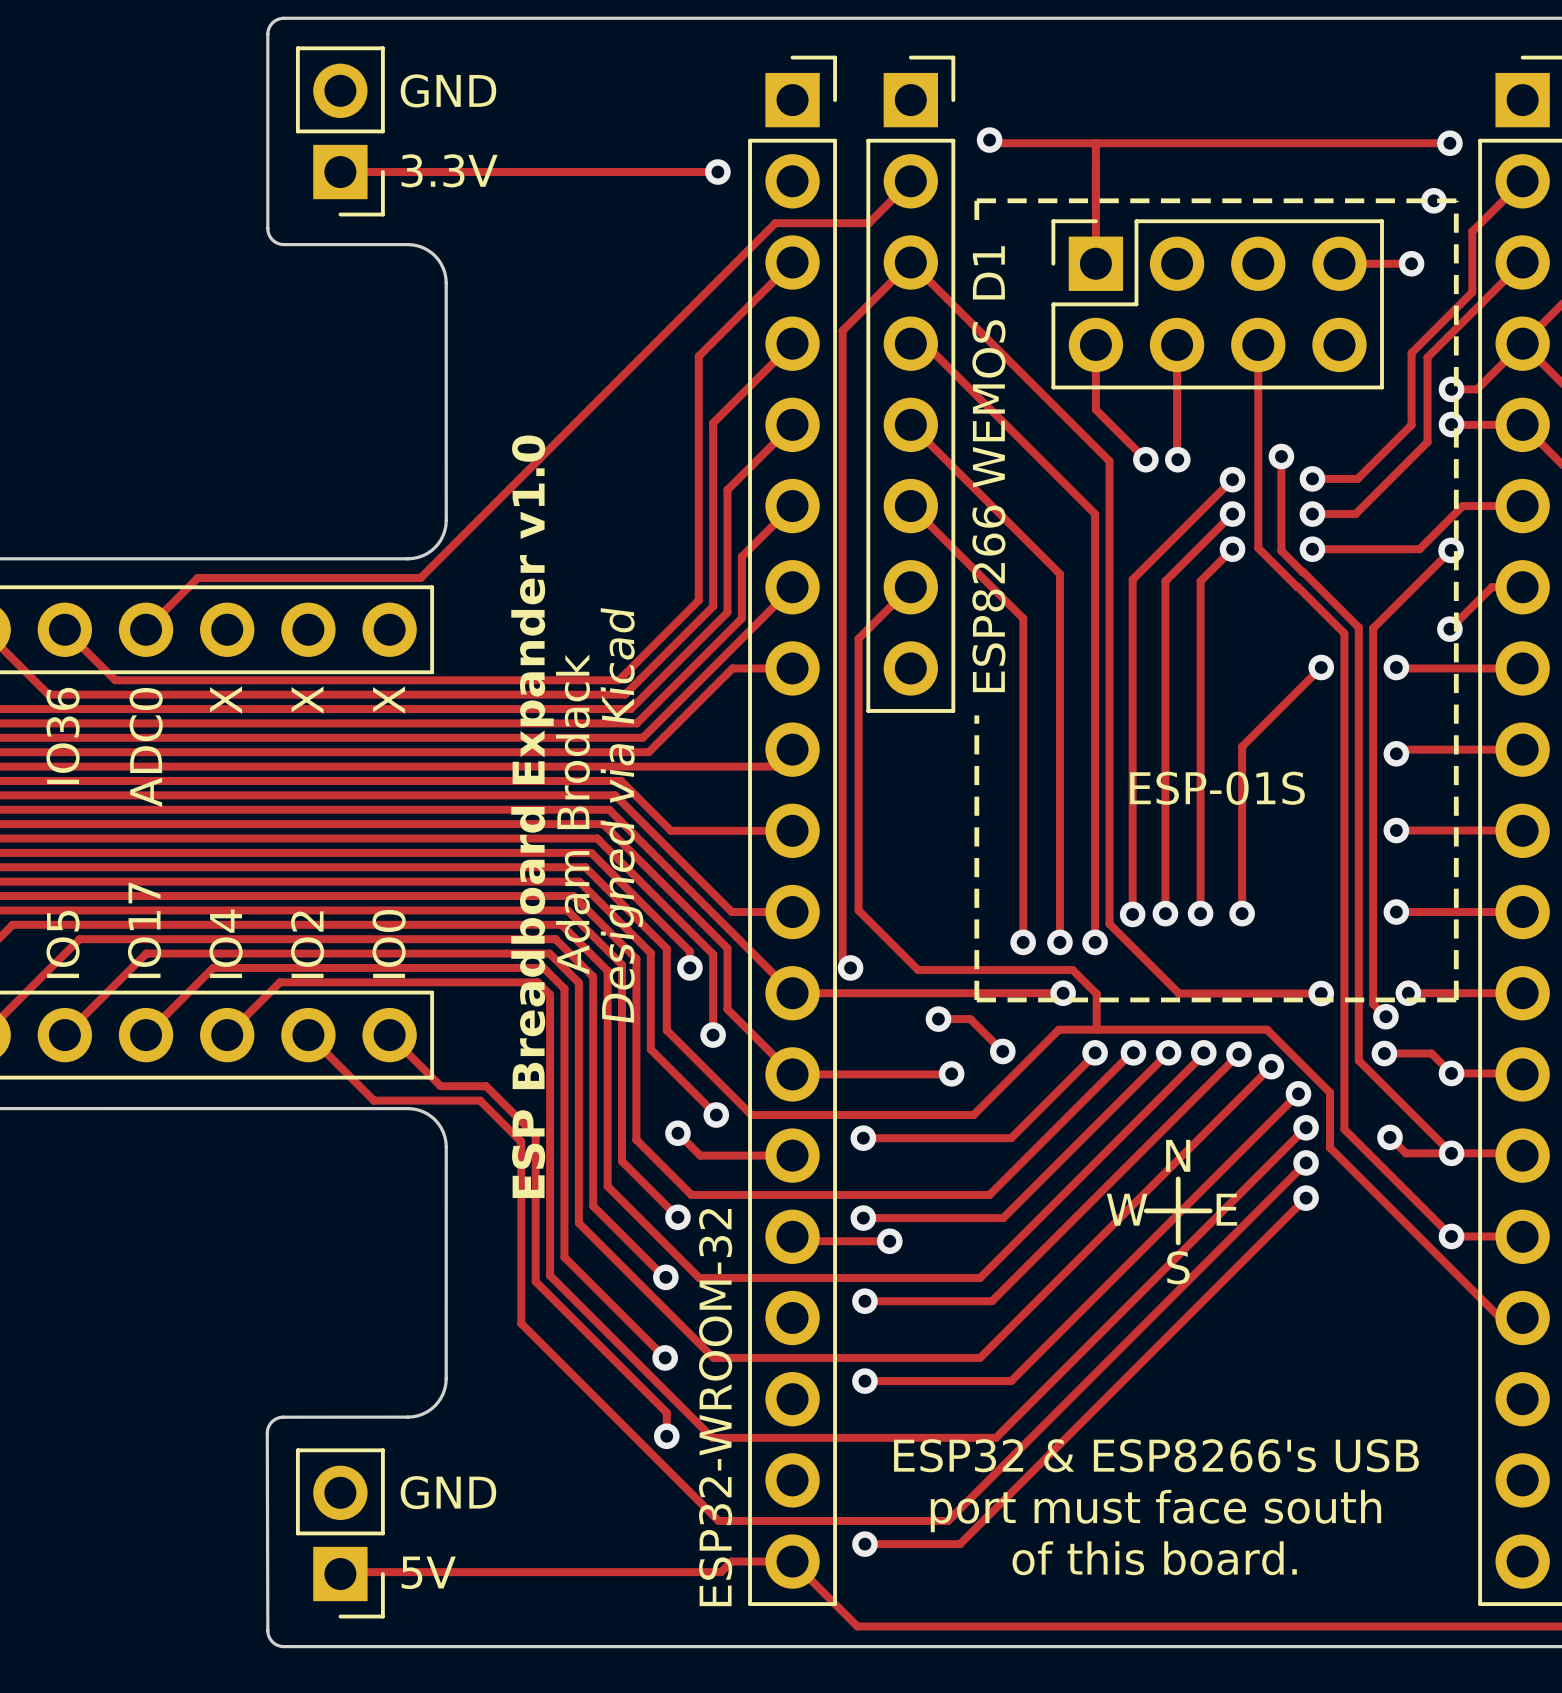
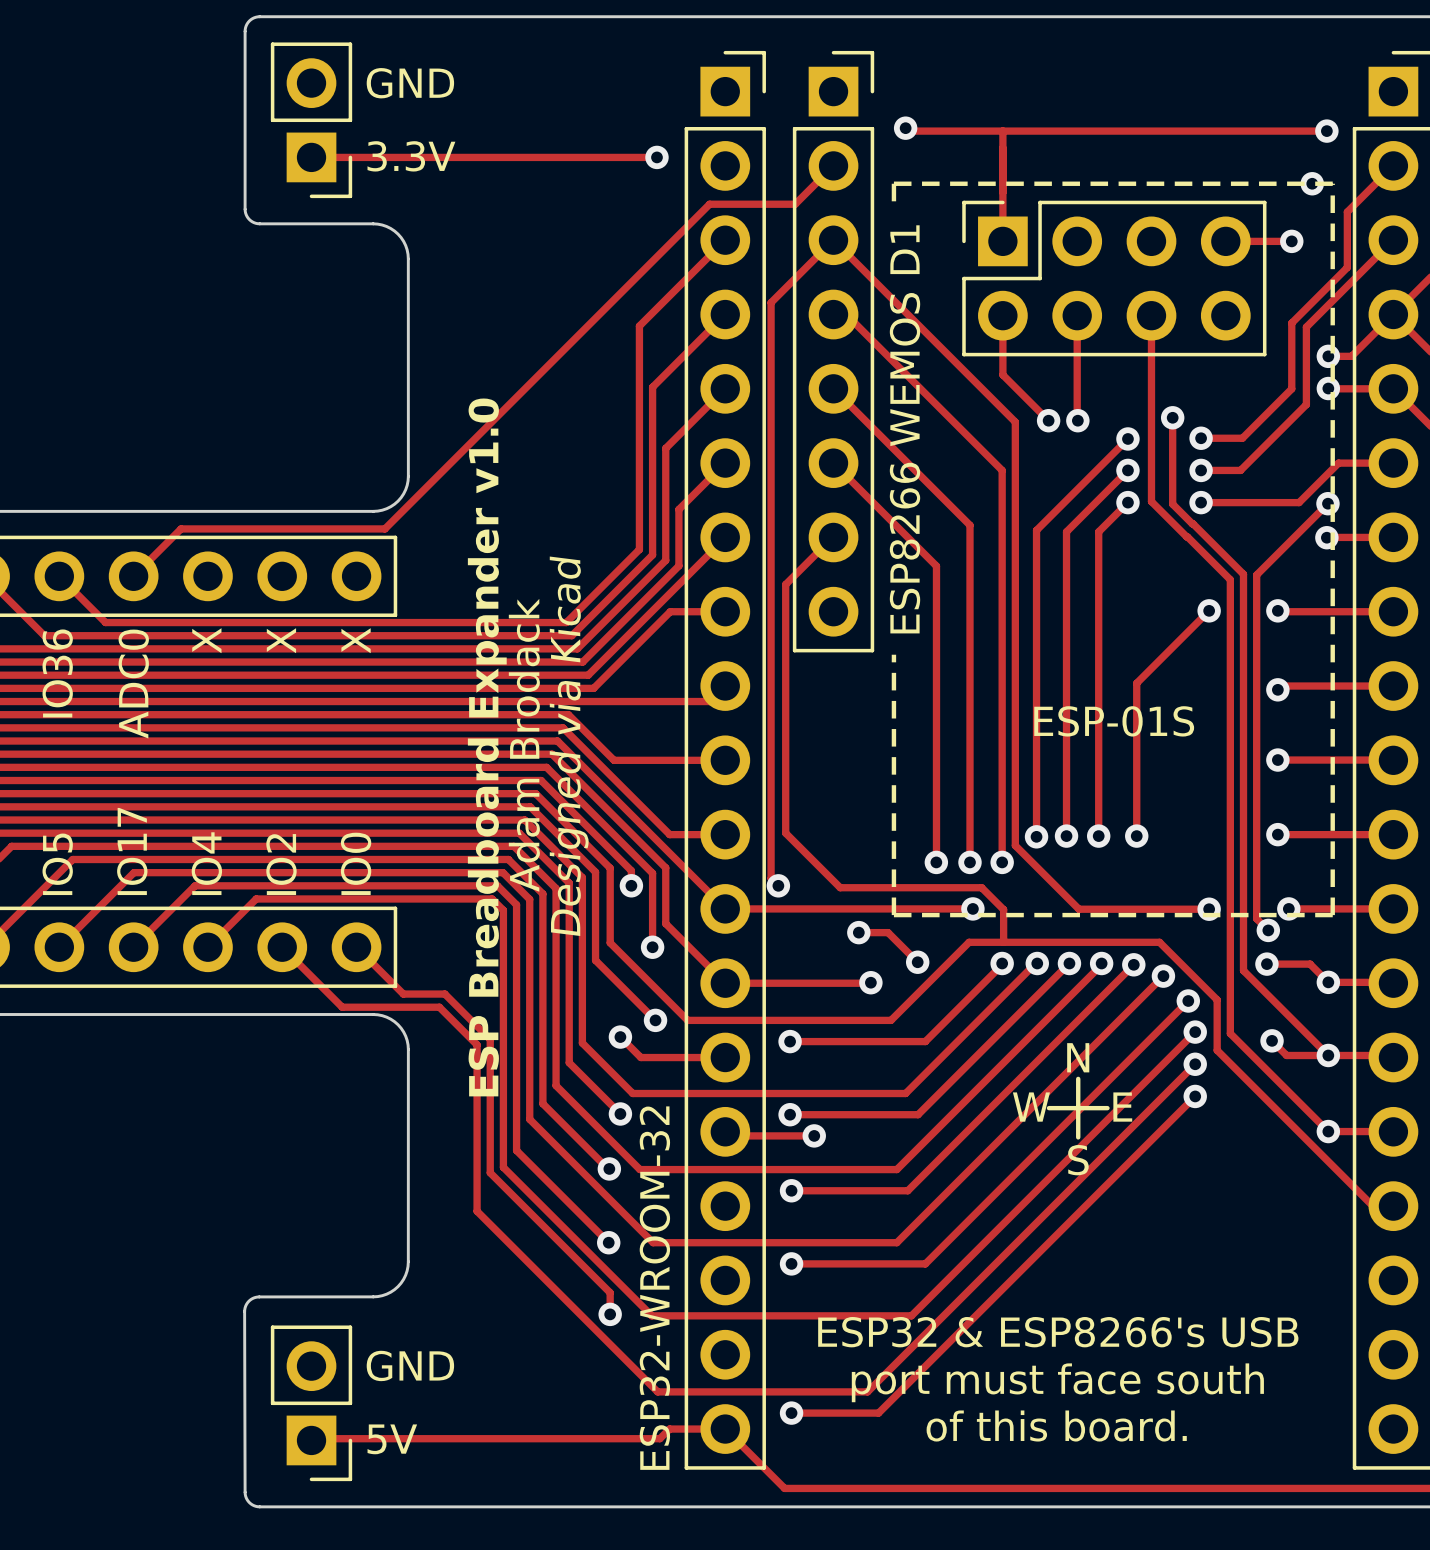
track: (1491, 587) (1449, 629) -> (1365, 537) (1327, 537)
via position: (1449, 629) -> (1326, 537)

